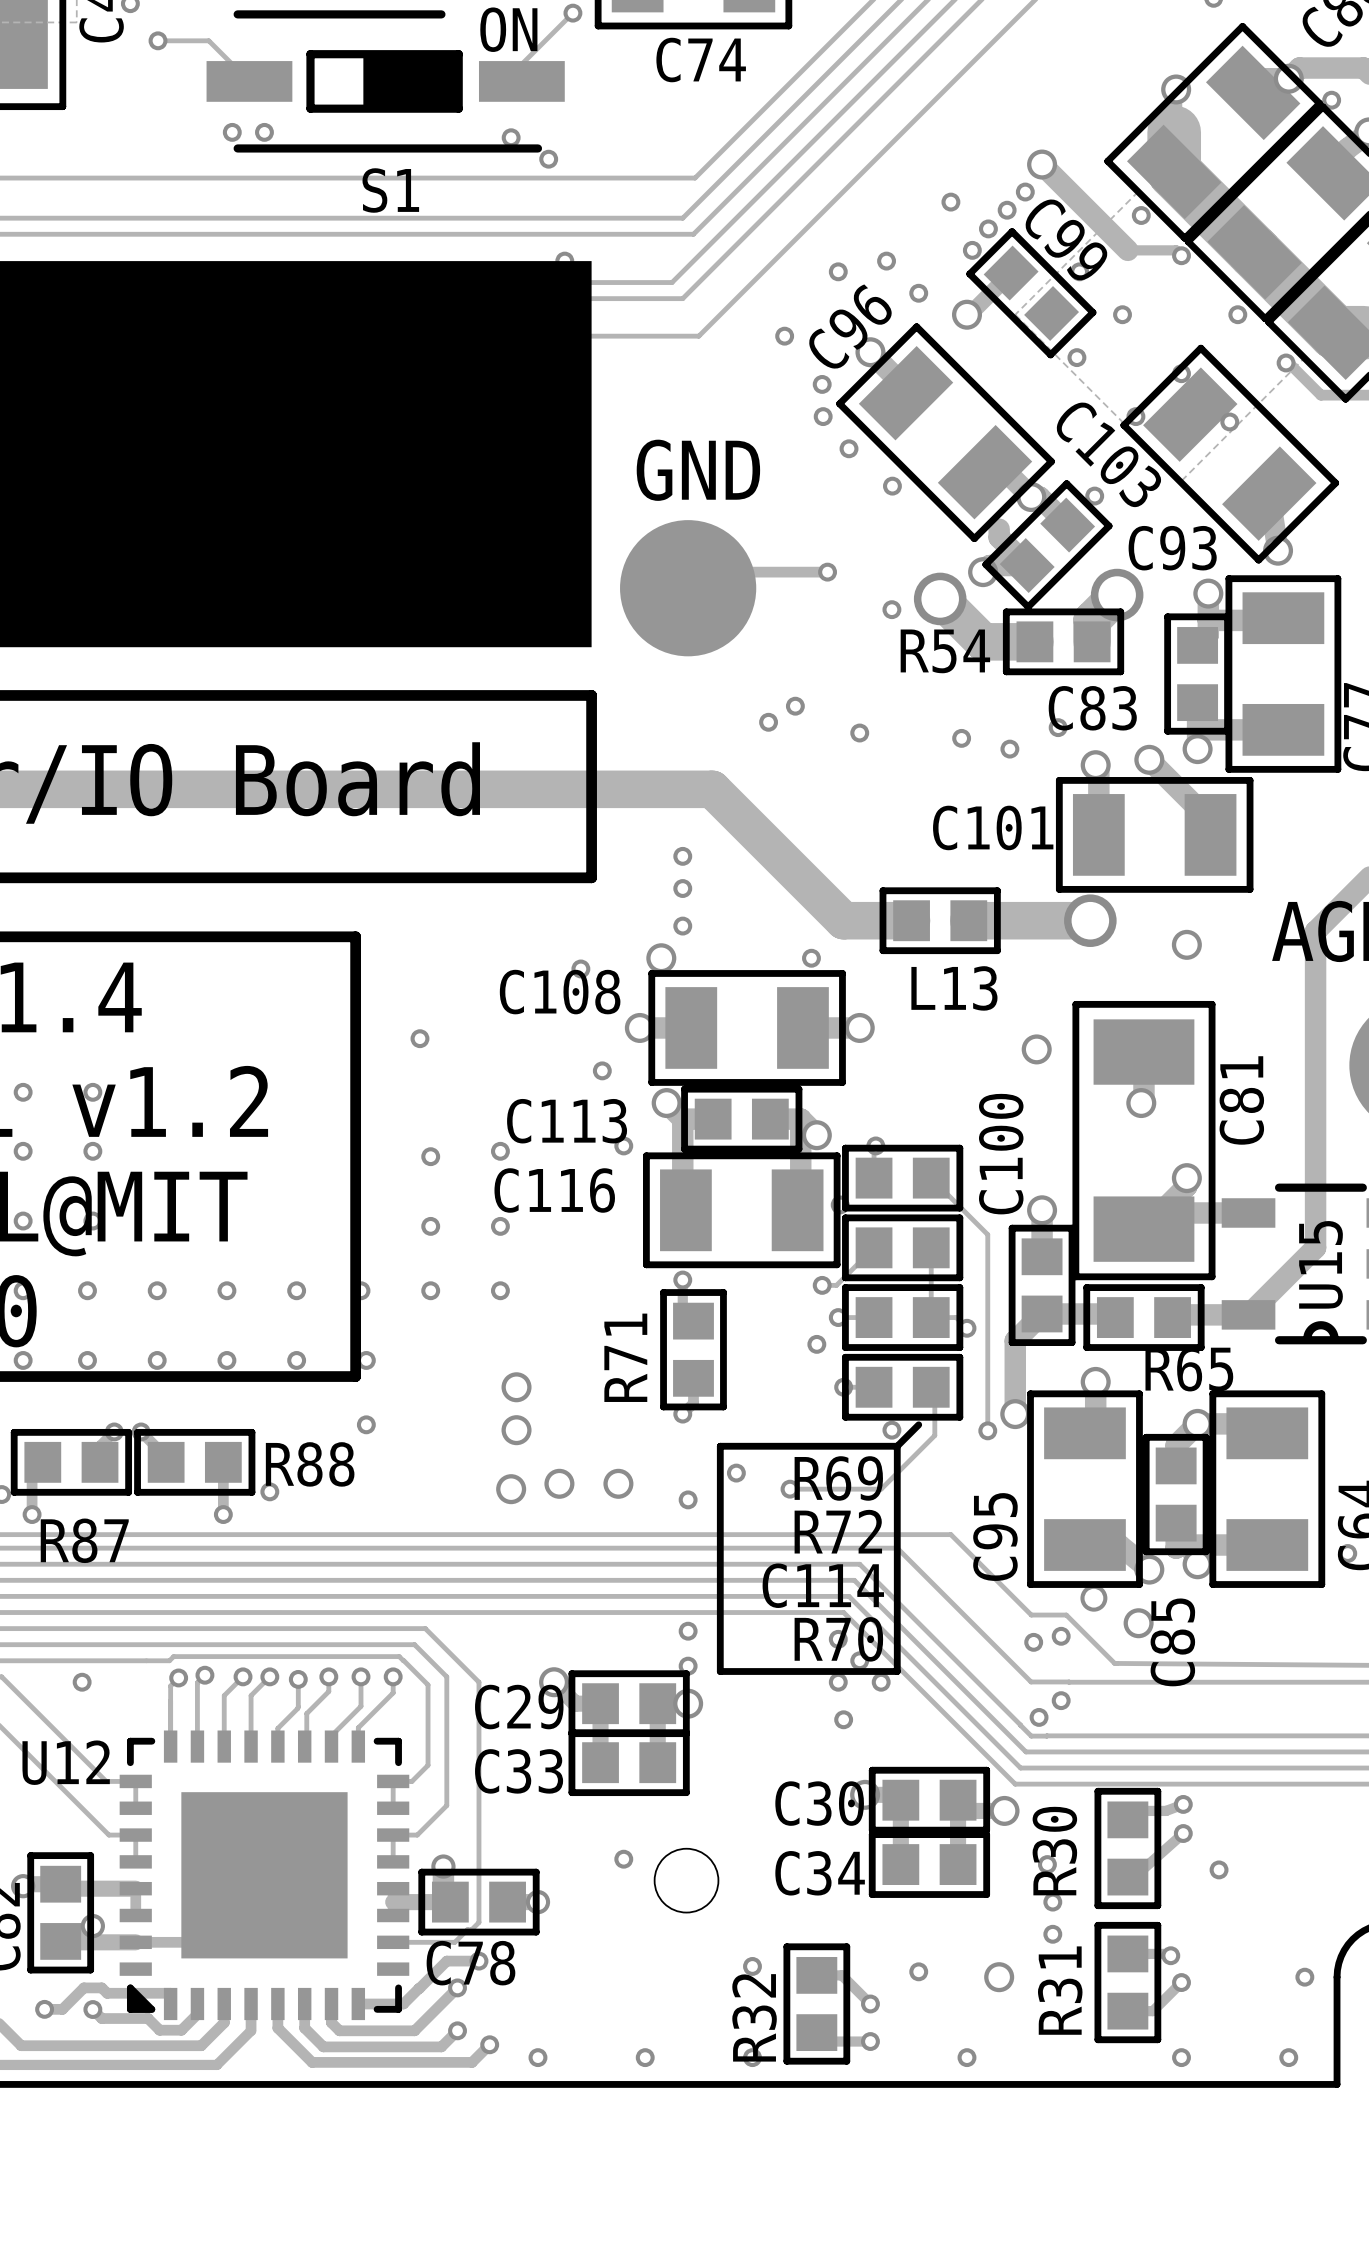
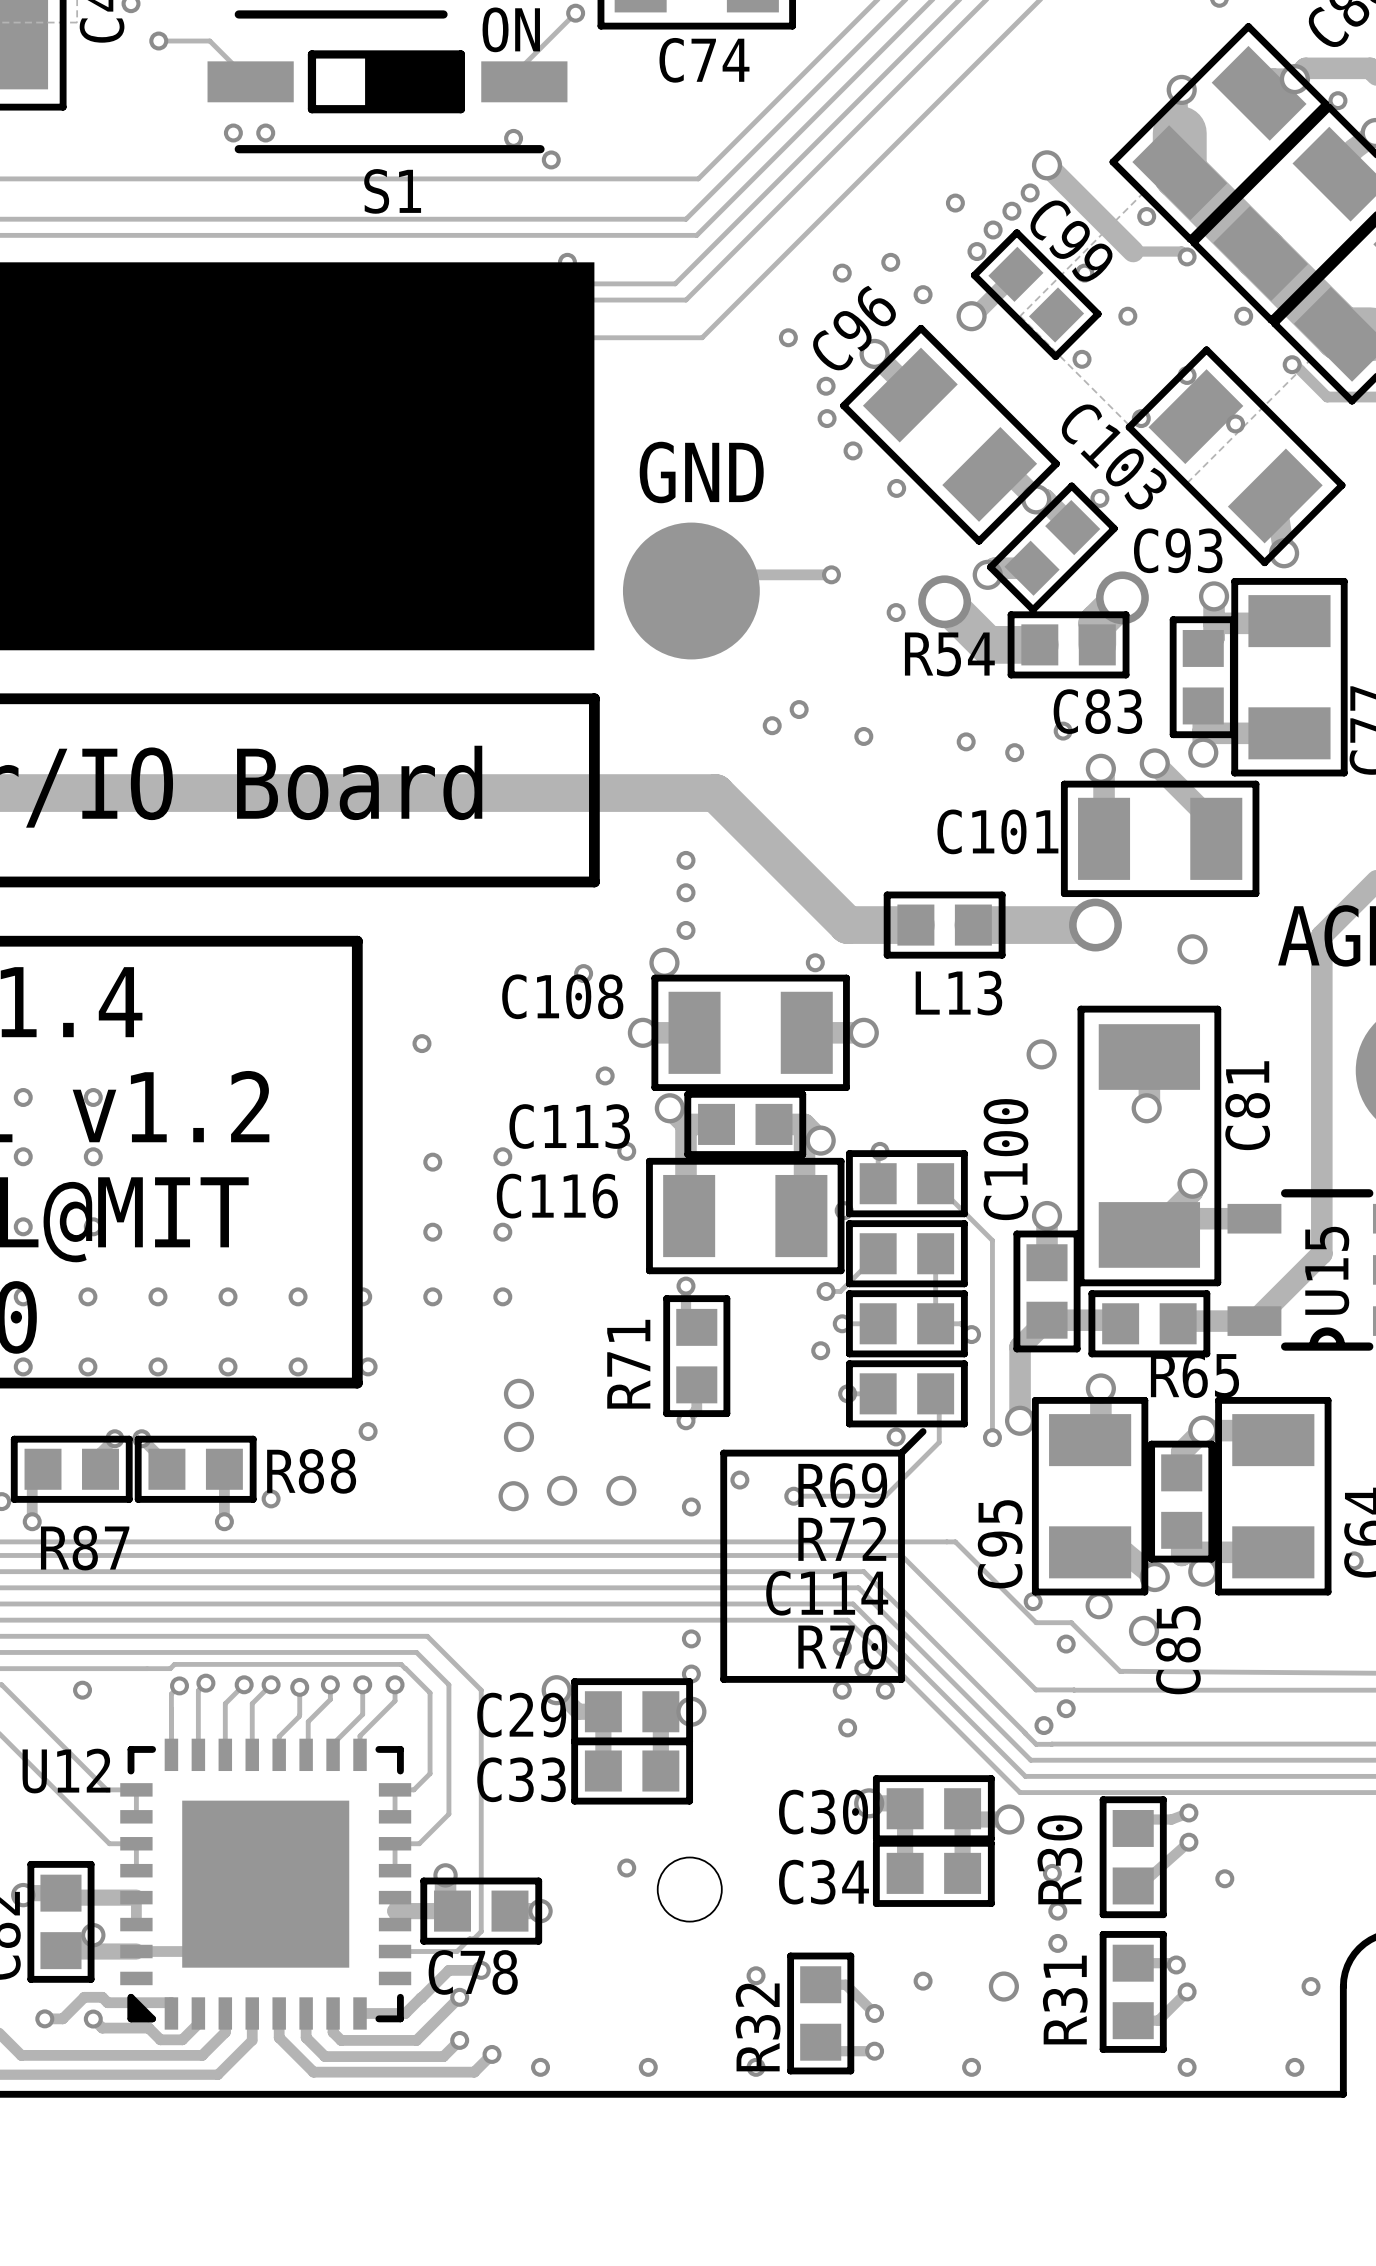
track: (999, 529) (999, 537) (1027, 565) -> none
via position: (1033, 1642) -> (1033, 1601)

